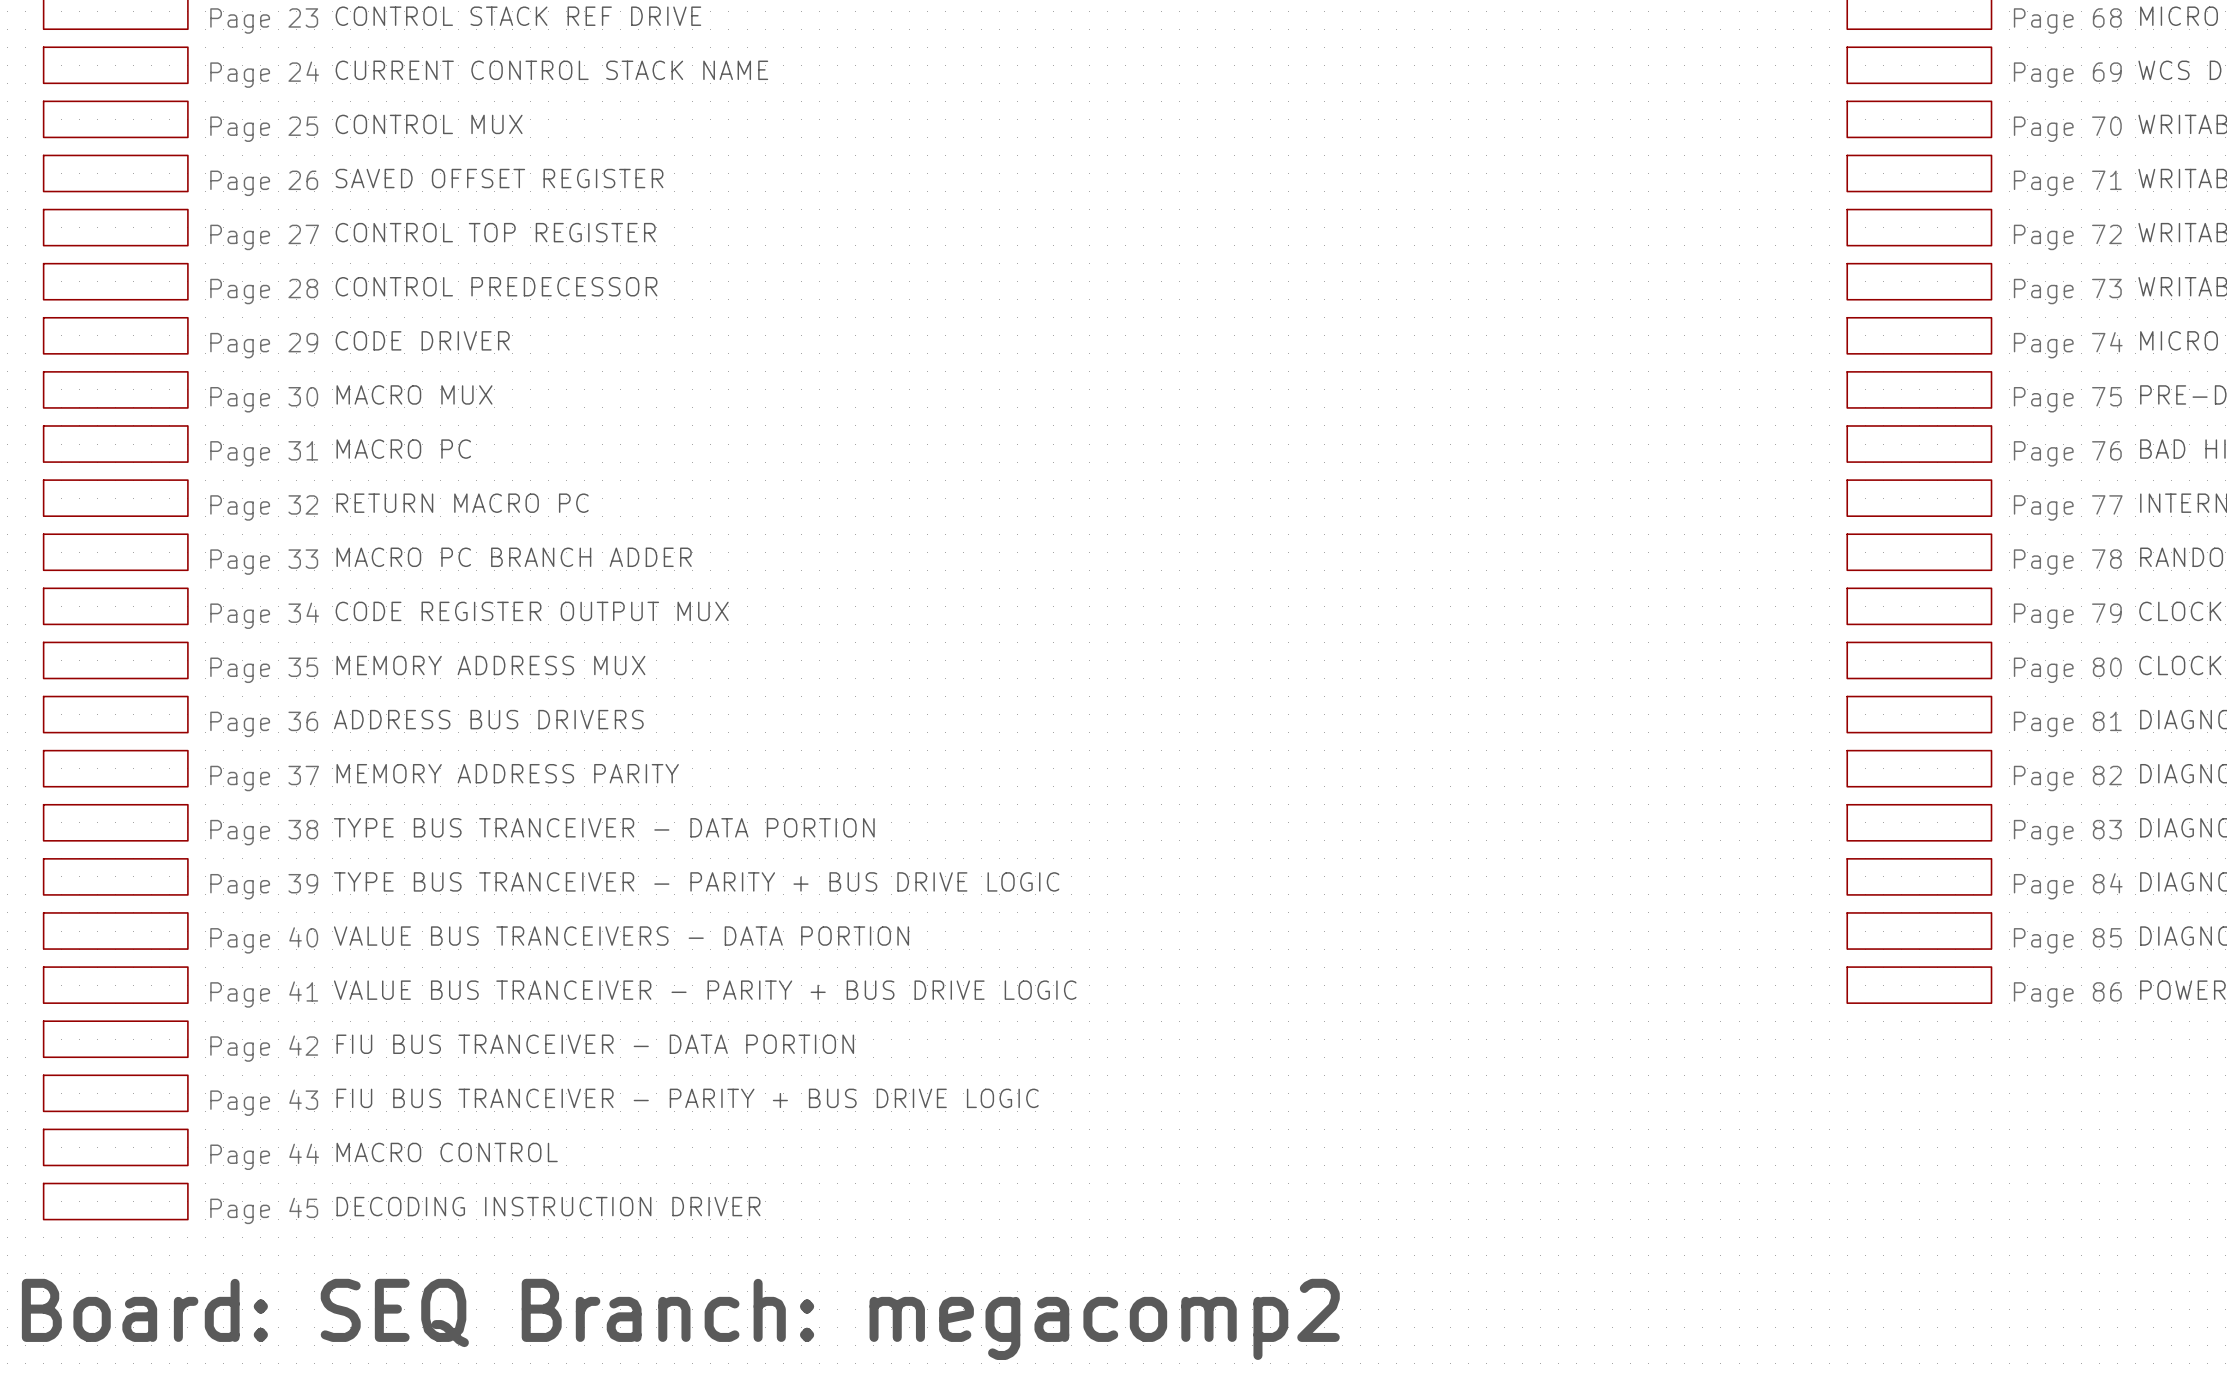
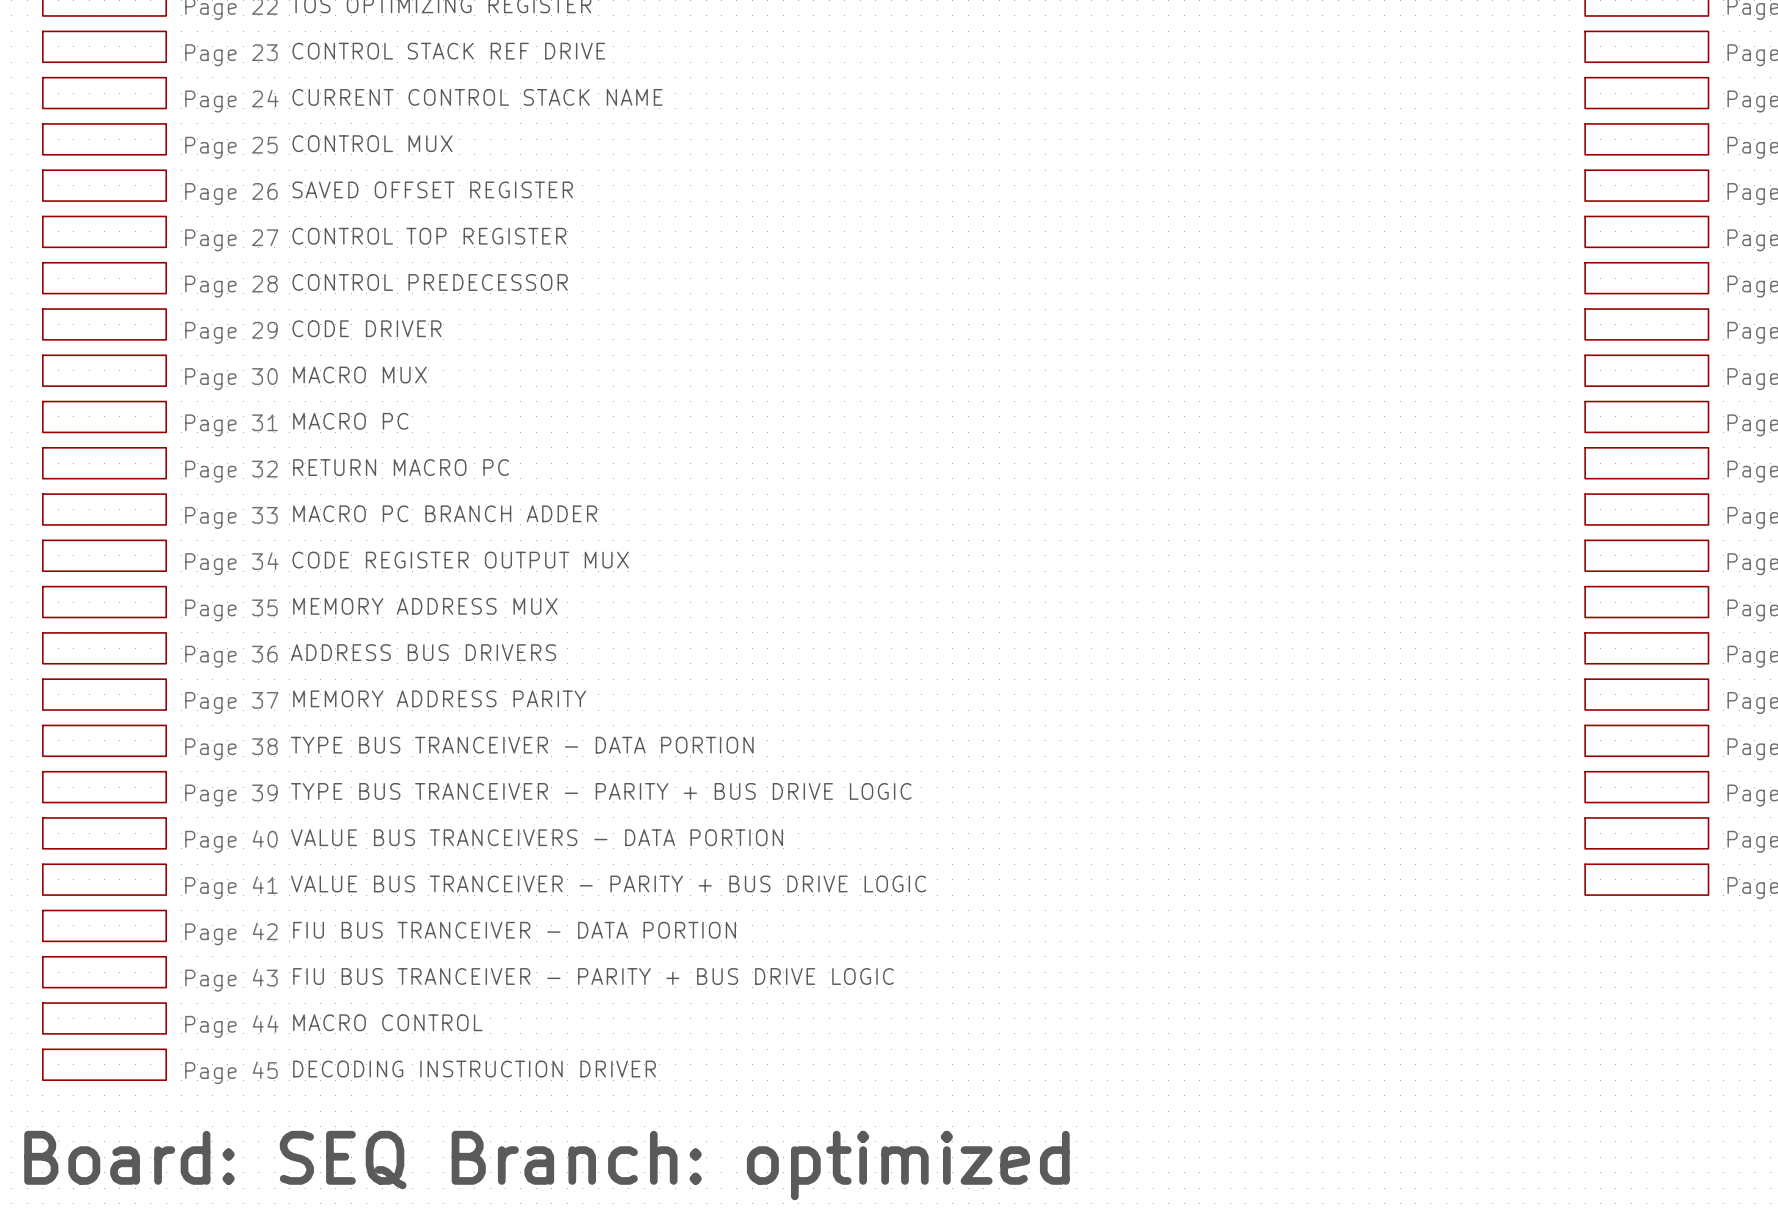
text: Board: SEQ Branch: megacomp2 (680, 1319) -> Board: SEQ Branch: optimized (546, 1165)

